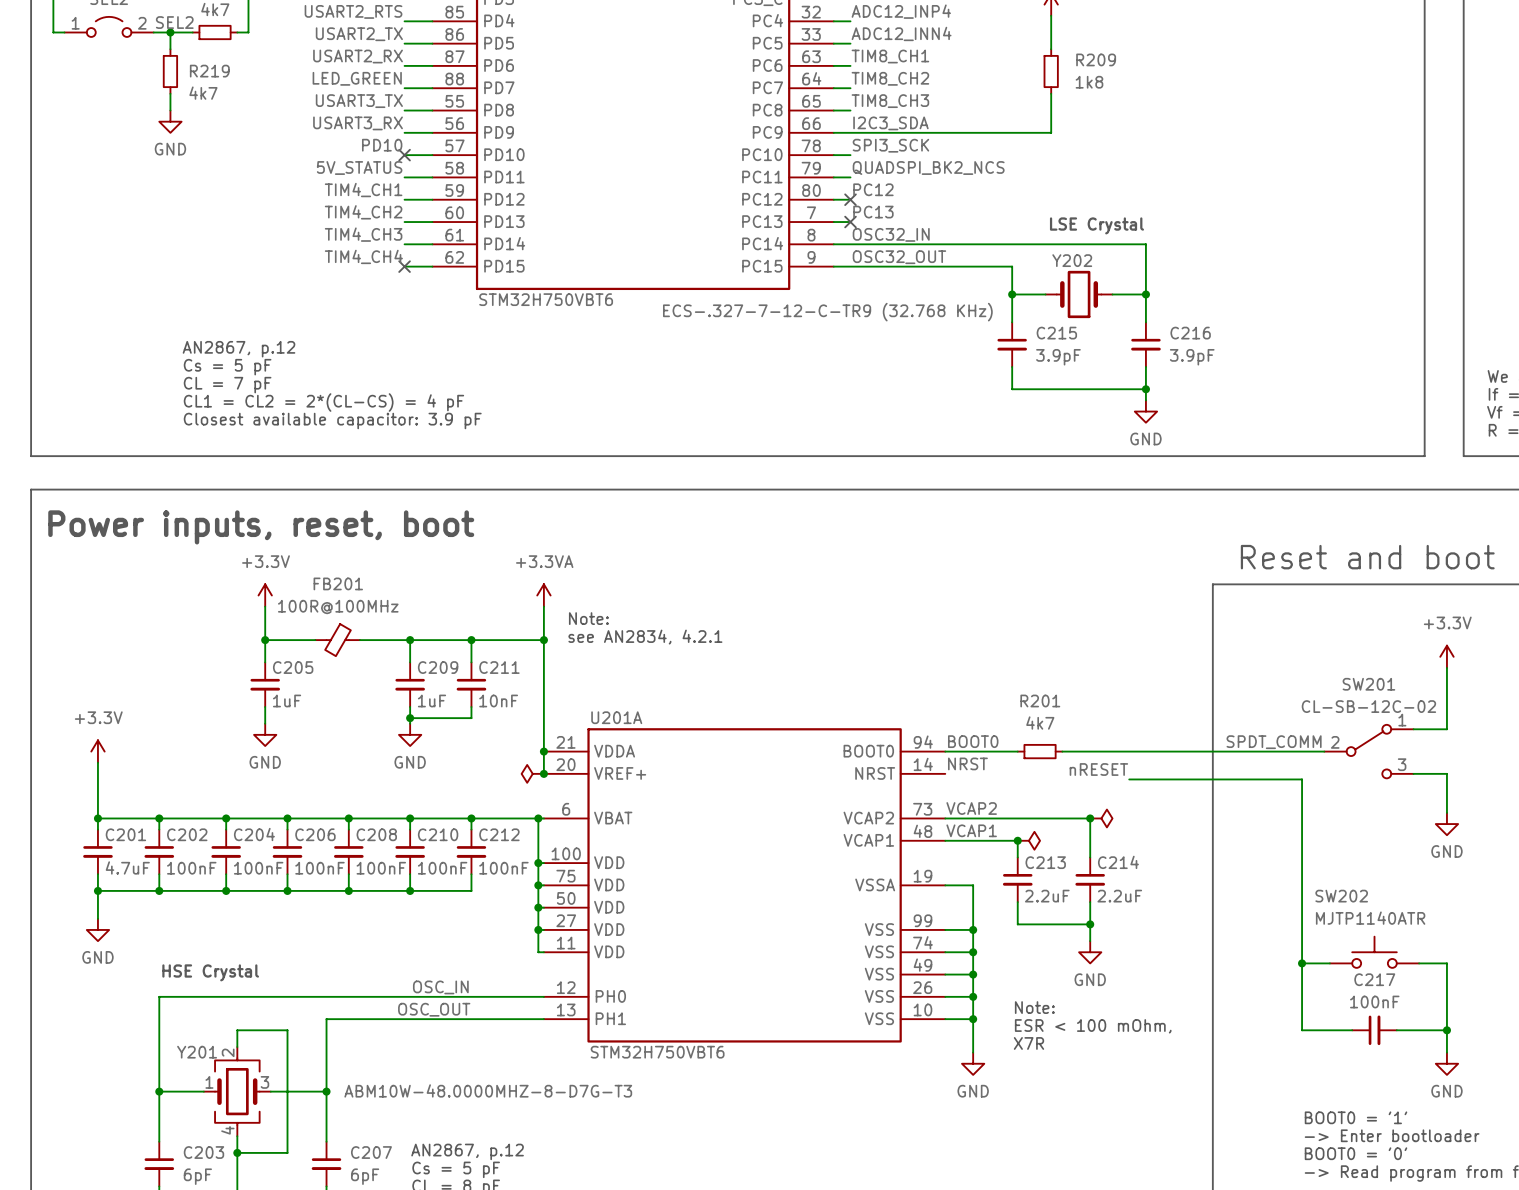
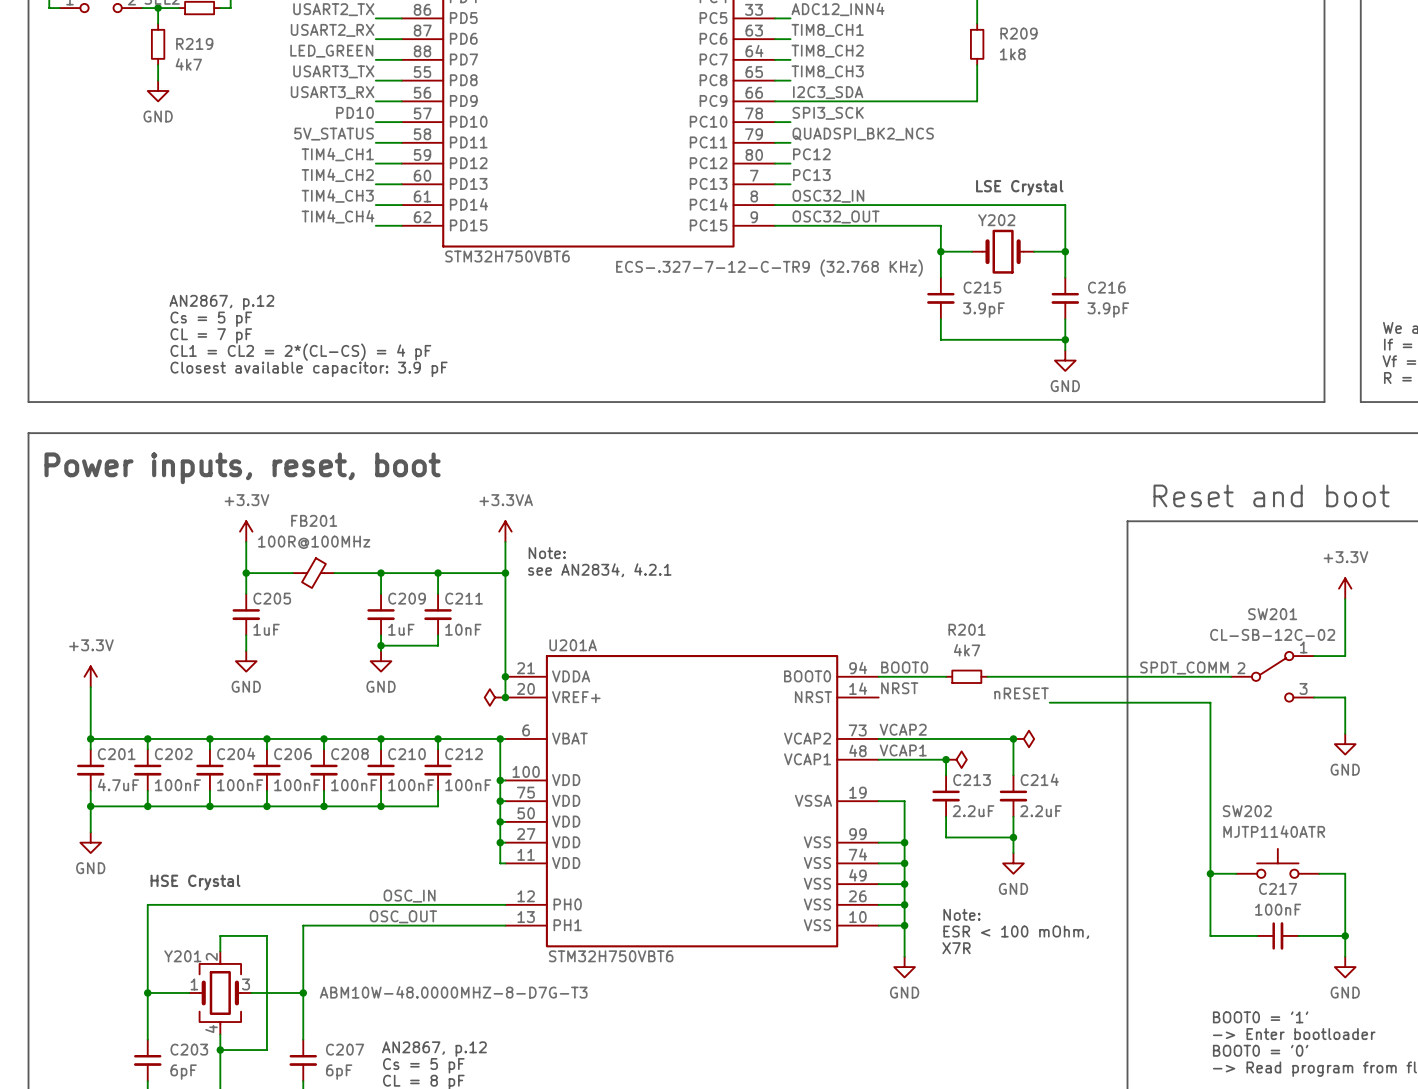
no-connect mark: (404, 155) -> none
no-connect mark: (850, 199) -> none
no-connect mark: (850, 222) -> none
no-connect mark: (404, 266) -> none

